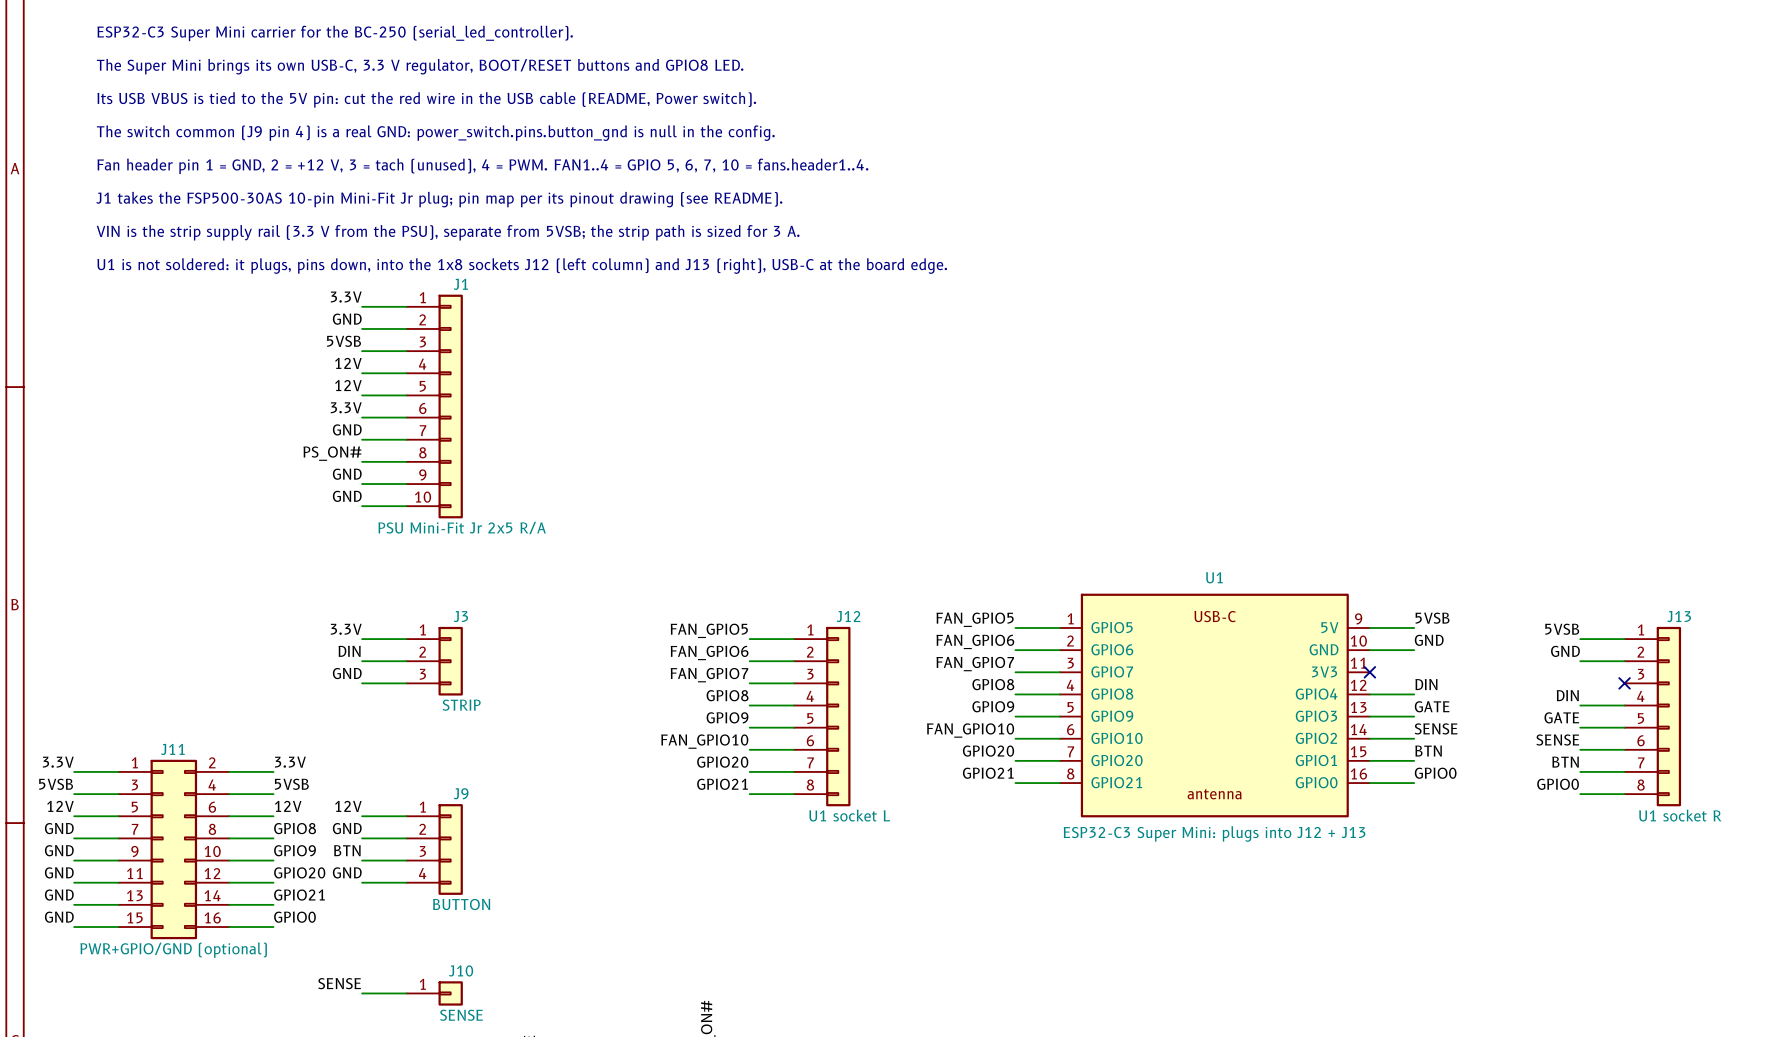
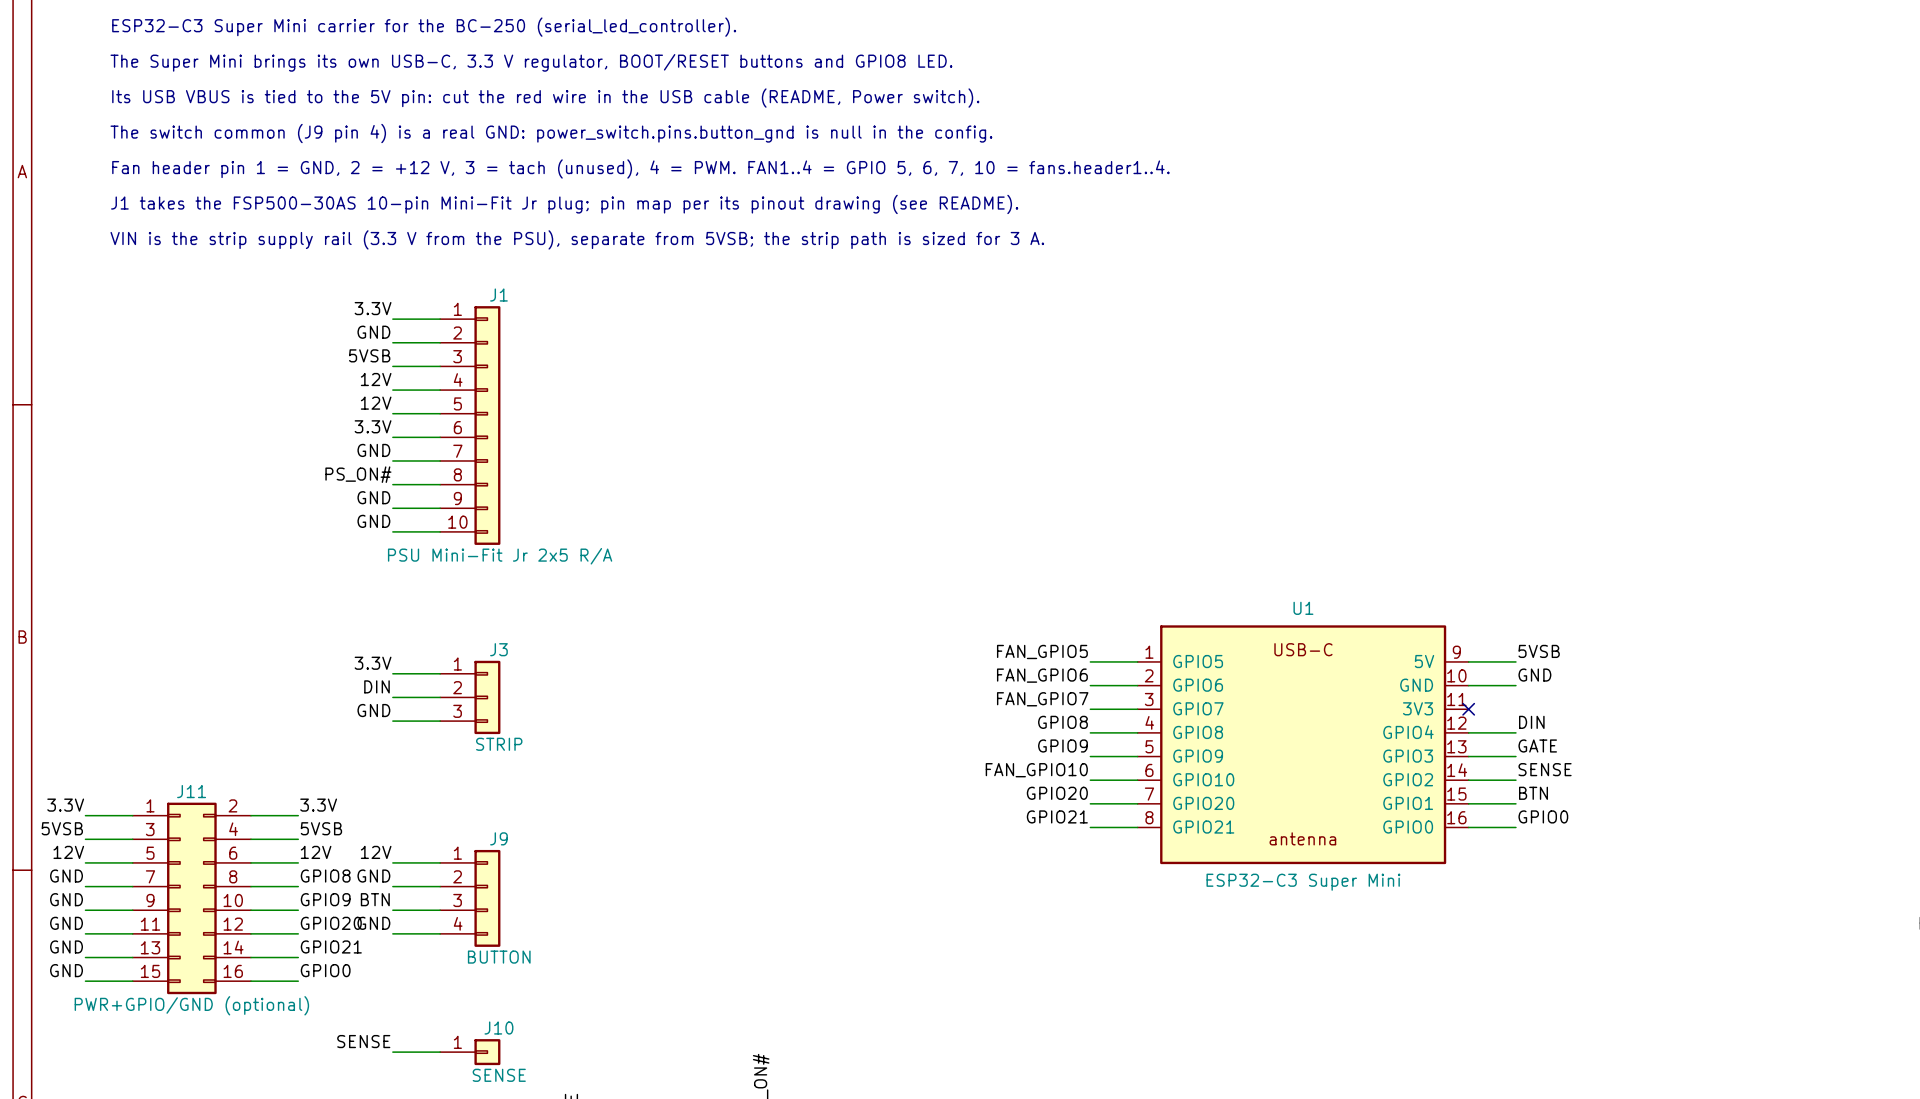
text: U1 is not soldered: it plugs, pins down, into the 1x8 sockets J12 (left column) and J13 (right), USB-C at the board edge. (522, 266) -> none
label: 5VSB (1562, 629) -> none
label: FAN_GPIO5 (709, 630) -> none
wire: (749, 639) (793, 639) -> none
wire: (1580, 639) (1624, 639) -> none
label: GND (1565, 651) -> none
label: FAN_GPIO6 (709, 652) -> none
wire: (749, 661) (793, 661) -> none
wire: (1580, 661) (1624, 661) -> none
label: FAN_GPIO7 (709, 675) -> none
wire: (749, 683) (793, 683) -> none
no-connect mark: (1624, 683) -> none
label: GPIO8 (727, 695) -> none
label: DIN (1567, 695) -> none
wire: (749, 705) (793, 705) -> none
wire: (1580, 705) (1624, 705) -> none
J12: U1 socket L (822, 716) -> none
J13: U1 socket R (1652, 716) -> none
label: GPIO9 (727, 717) -> none
label: GATE (1561, 717) -> none
wire: (749, 727) (793, 727) -> none
wire: (1580, 727) (1624, 727) -> none
label: SENSE (1557, 739) -> none
label: FAN_GPIO10 (704, 741) -> none
wire: (749, 749) (793, 749) -> none
wire: (1580, 749) (1624, 749) -> none
label: GPIO20 (722, 762) -> none
label: BTN (1565, 762) -> none
wire: (749, 771) (793, 771) -> none
wire: (1580, 771) (1624, 771) -> none
label: GPIO21 (722, 784) -> none
label: GPIO0 (1558, 784) -> none
wire: (749, 794) (793, 794) -> none
wire: (1580, 794) (1624, 794) -> none
U1 value: ESP32-C3 Super Mini: plugs into J12 + J13 (1214, 833) -> ESP32-C3 Super Mini (1303, 882)

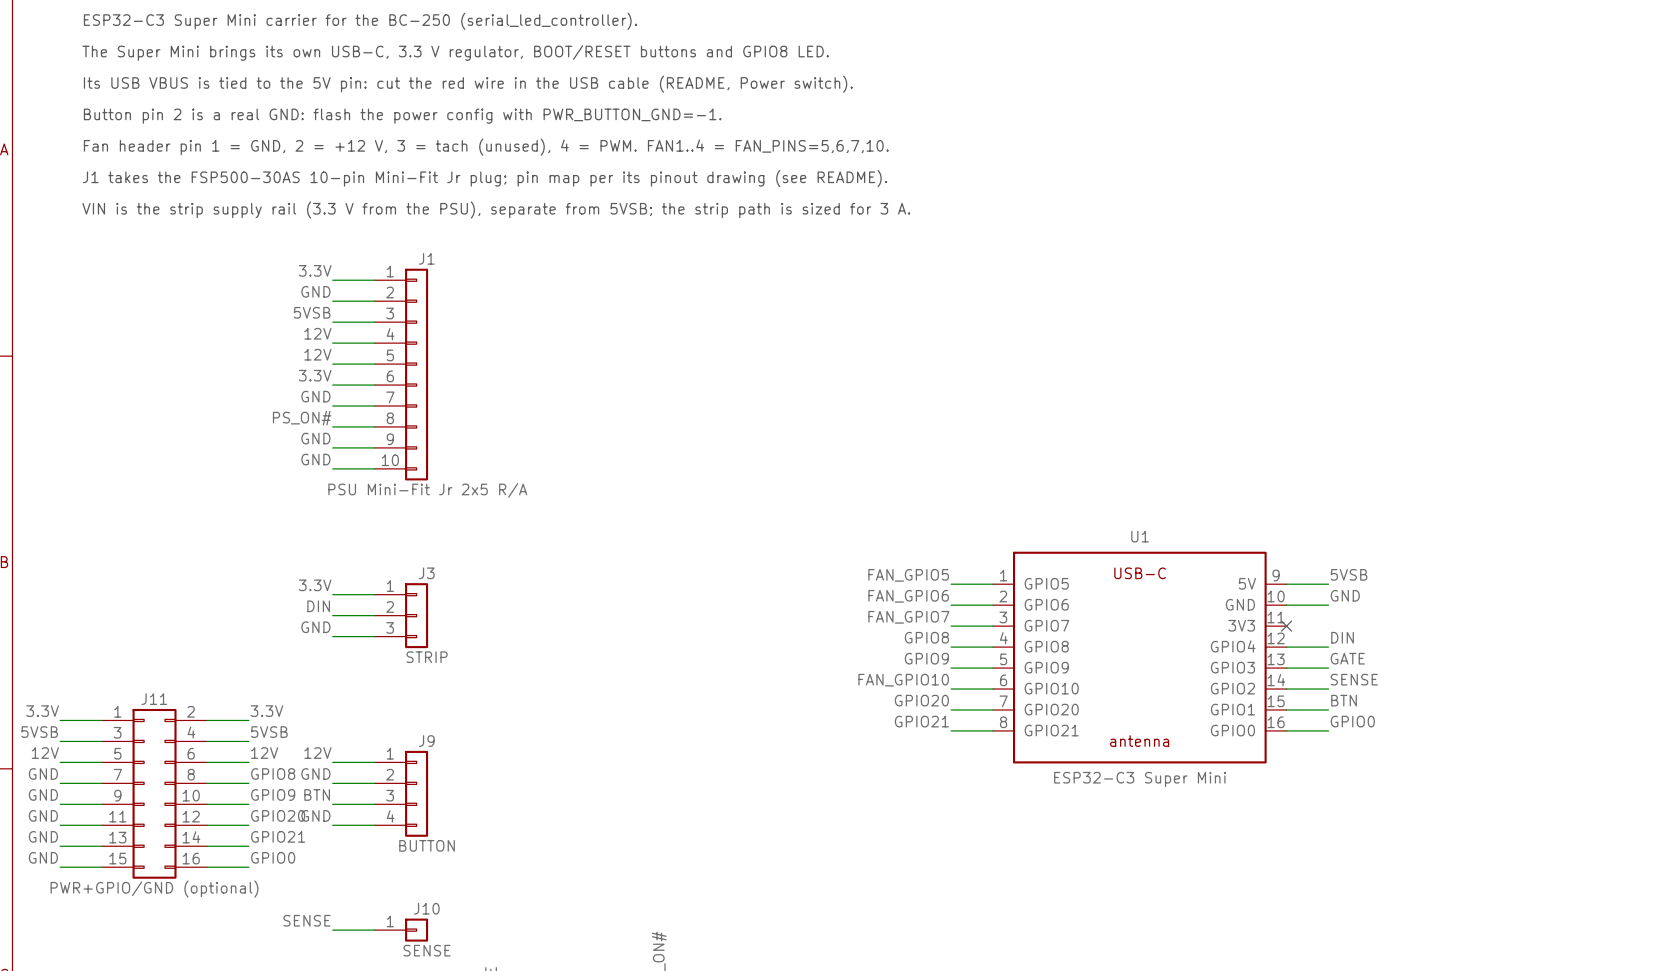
text: The switch common (J9 pin 4) is a real GND: power_switch.pins.button_gnd is null in the config. (551, 133) -> Button pin 2 is a real GND: flash the power config with PWR_BUTTON_GND=-1. (402, 116)
text: Fan header pin 1 = GND, 2 = +12 V, 3 = tach (unused), 4 = PWM. FAN1..4 = GPIO 5, 6, 7, 10 = fans.header1..4. (640, 168) -> Fan header pin 1 = GND, 2 = +12 V, 3 = tach (unused), 4 = PWM. FAN1..4 = FAN_PINS=5,6,7,10. (486, 147)

